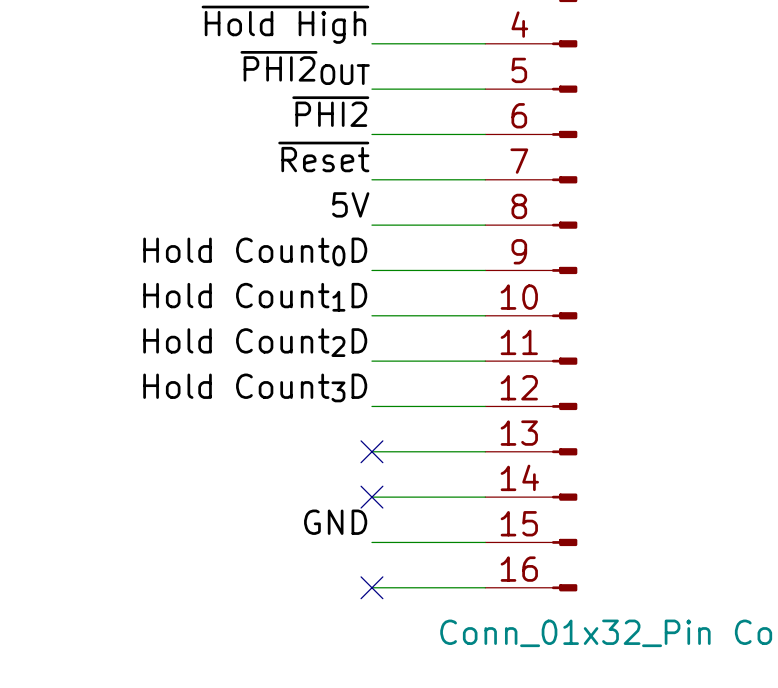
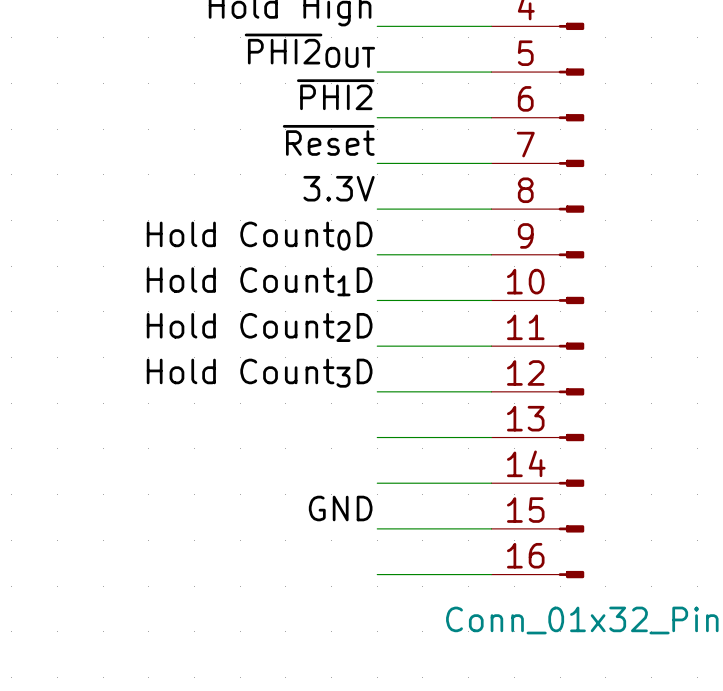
label: 5V (350, 204) -> 3.3V (339, 188)
no-connect mark: (371, 451) -> none
no-connect mark: (371, 497) -> none
no-connect mark: (371, 587) -> none

